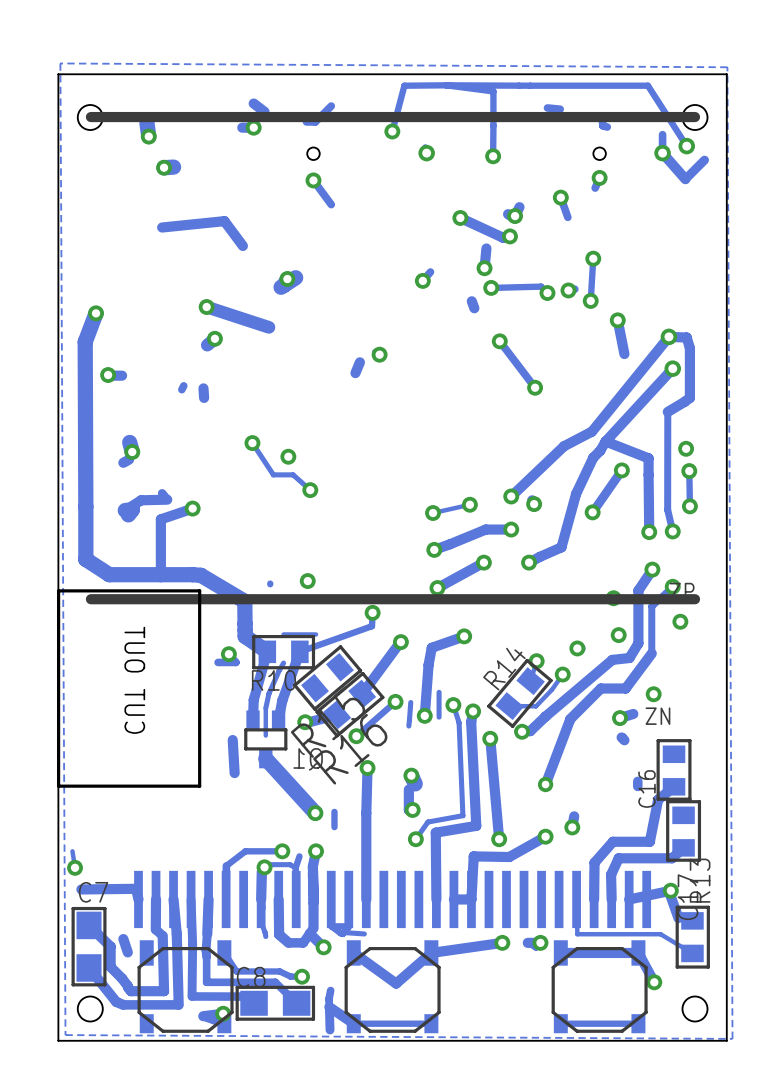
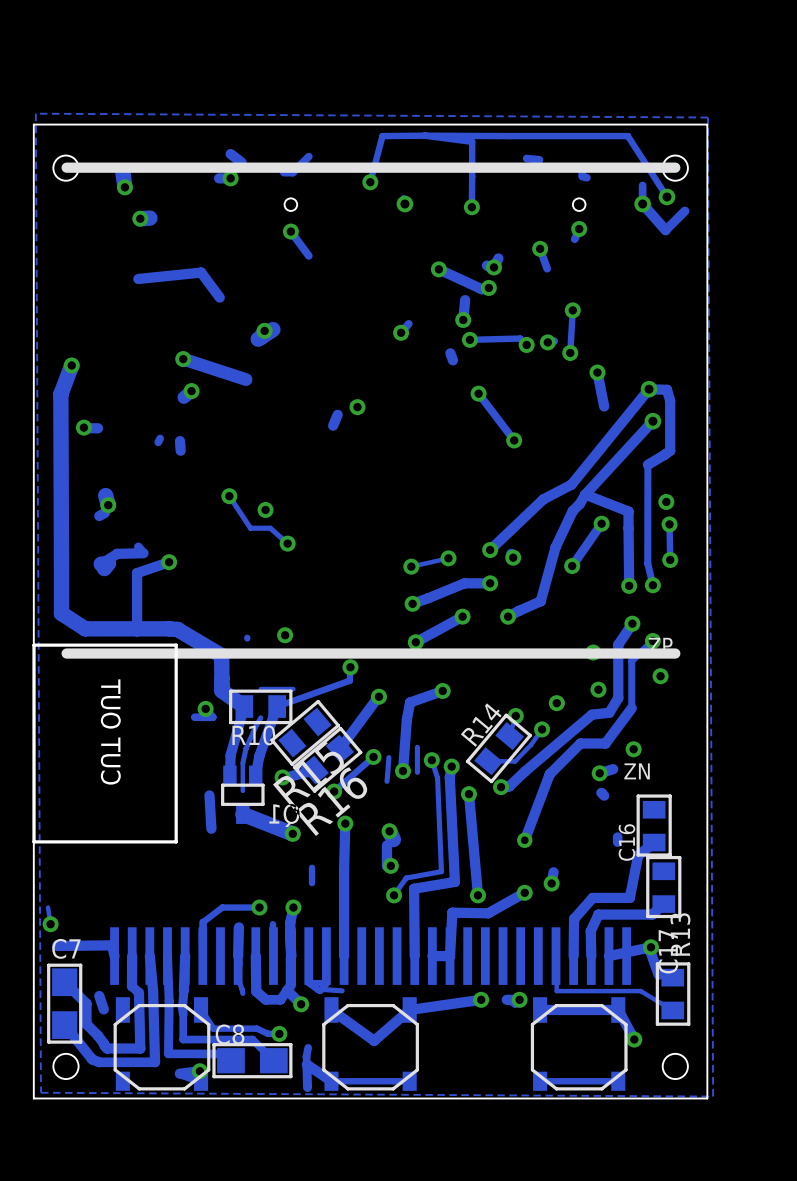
track: (265, 758) (315, 813) -> (242, 814) (292, 833)
via position: (315, 813) -> (292, 833)
track: (299, 856) (295, 867) (289, 864) (266, 864) (261, 871) -> none
via: (264, 867) -> none

